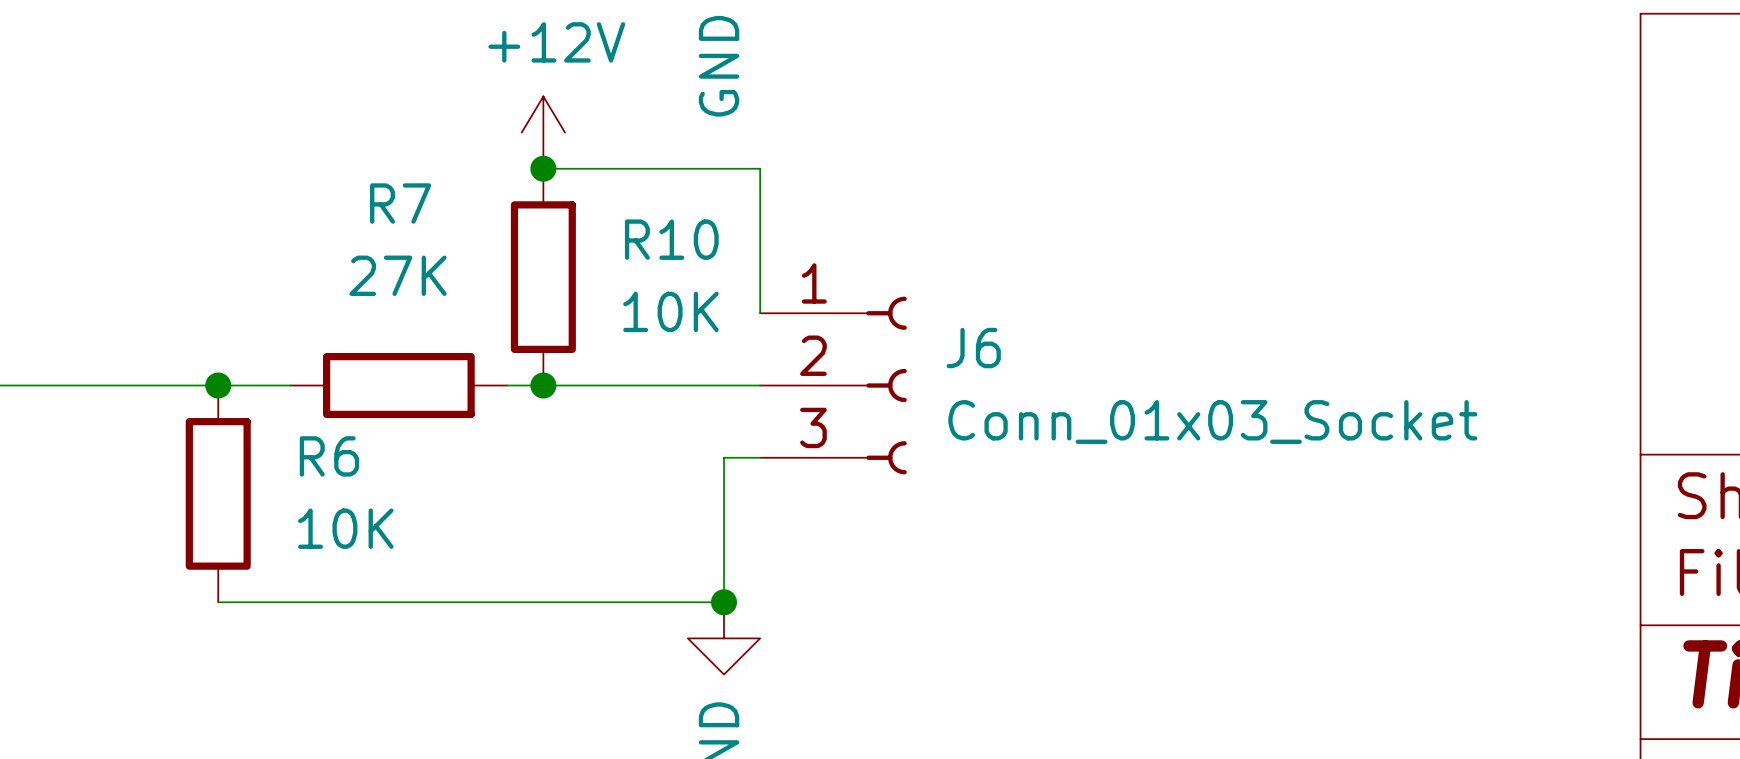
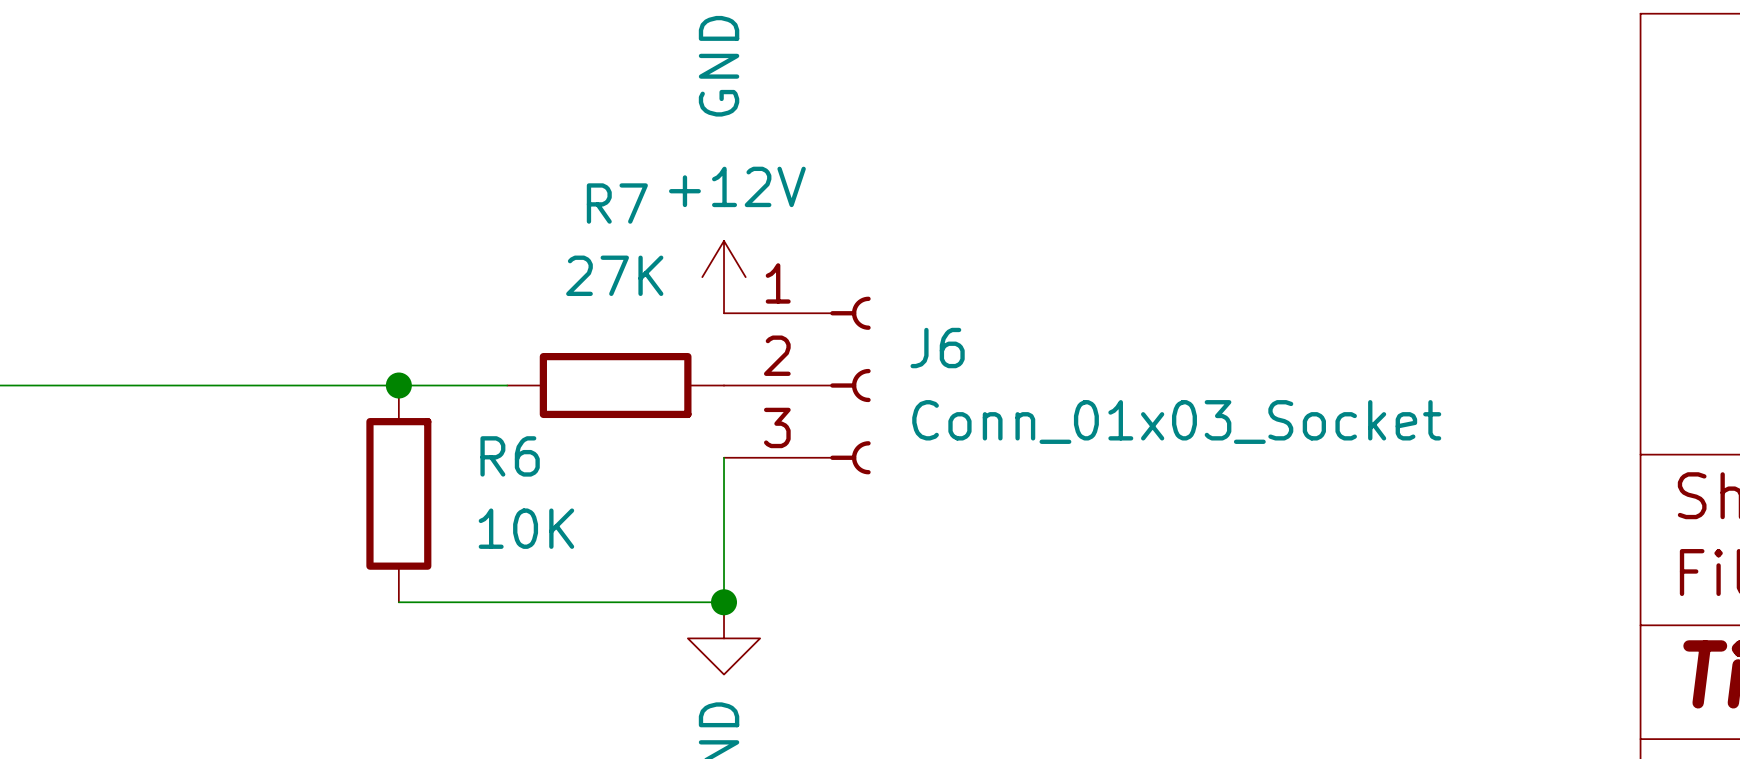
power symbol position: +12V (543, 132) -> +12V (724, 277)
wire: (543, 168) (760, 168) (760, 313) -> none
junction: (543, 168) -> none
R10: 10K (543, 277) -> none
junction: (218, 385) -> none
junction: none -> (398, 385)
R7 position: (398, 385) -> (615, 385)
wire: (507, 385) (760, 385) -> (507, 385) (290, 385)
junction: (543, 385) -> none
J6 position: (833, 385) -> (797, 385)
R6 position: (218, 493) -> (398, 493)
wire: (218, 602) (398, 602) -> none

